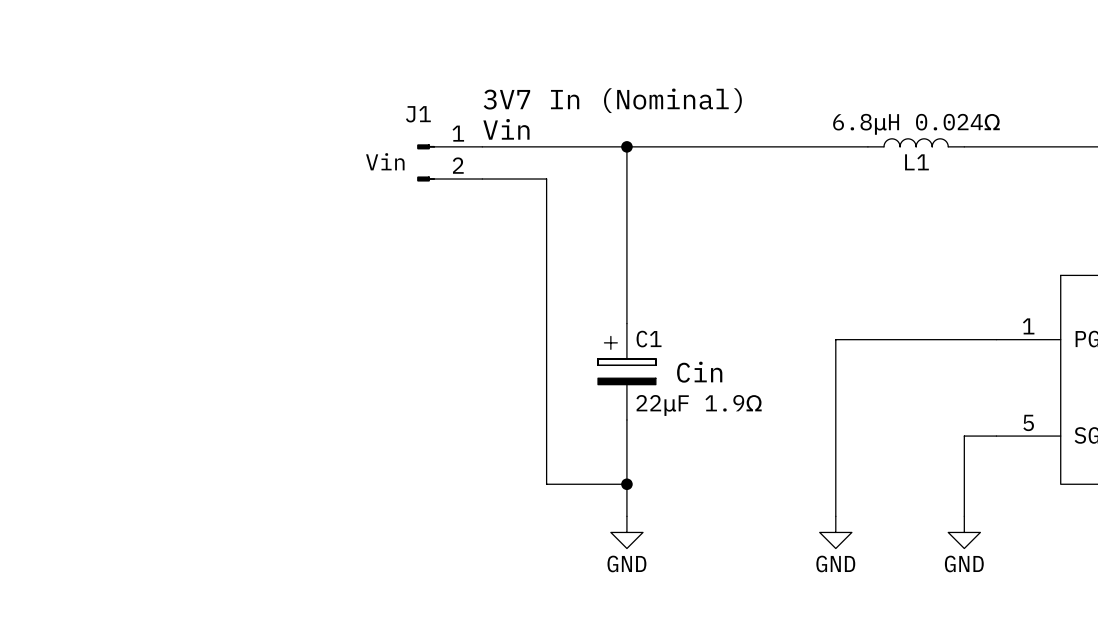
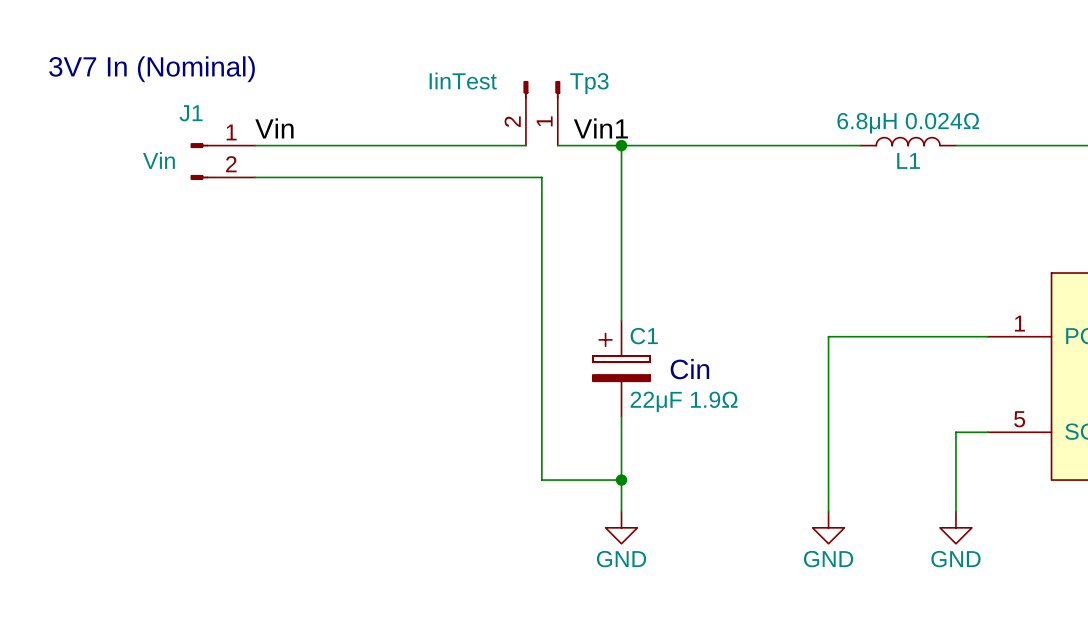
text: none -> 3V7 In (Nominal) (152, 69)
text: 3V7 In (Nominal) (612, 100) -> none
Tp3: none -> IinTest (541, 113)
label position: Vin (506, 129) -> Vin (274, 128)
label: none -> Vin1 (600, 128)
wire: none -> (255, 145) (478, 145)
wire: (530, 146) (562, 146) -> none
J1 position: (449, 162) -> (222, 161)
wire: none -> (255, 177) (478, 177)

